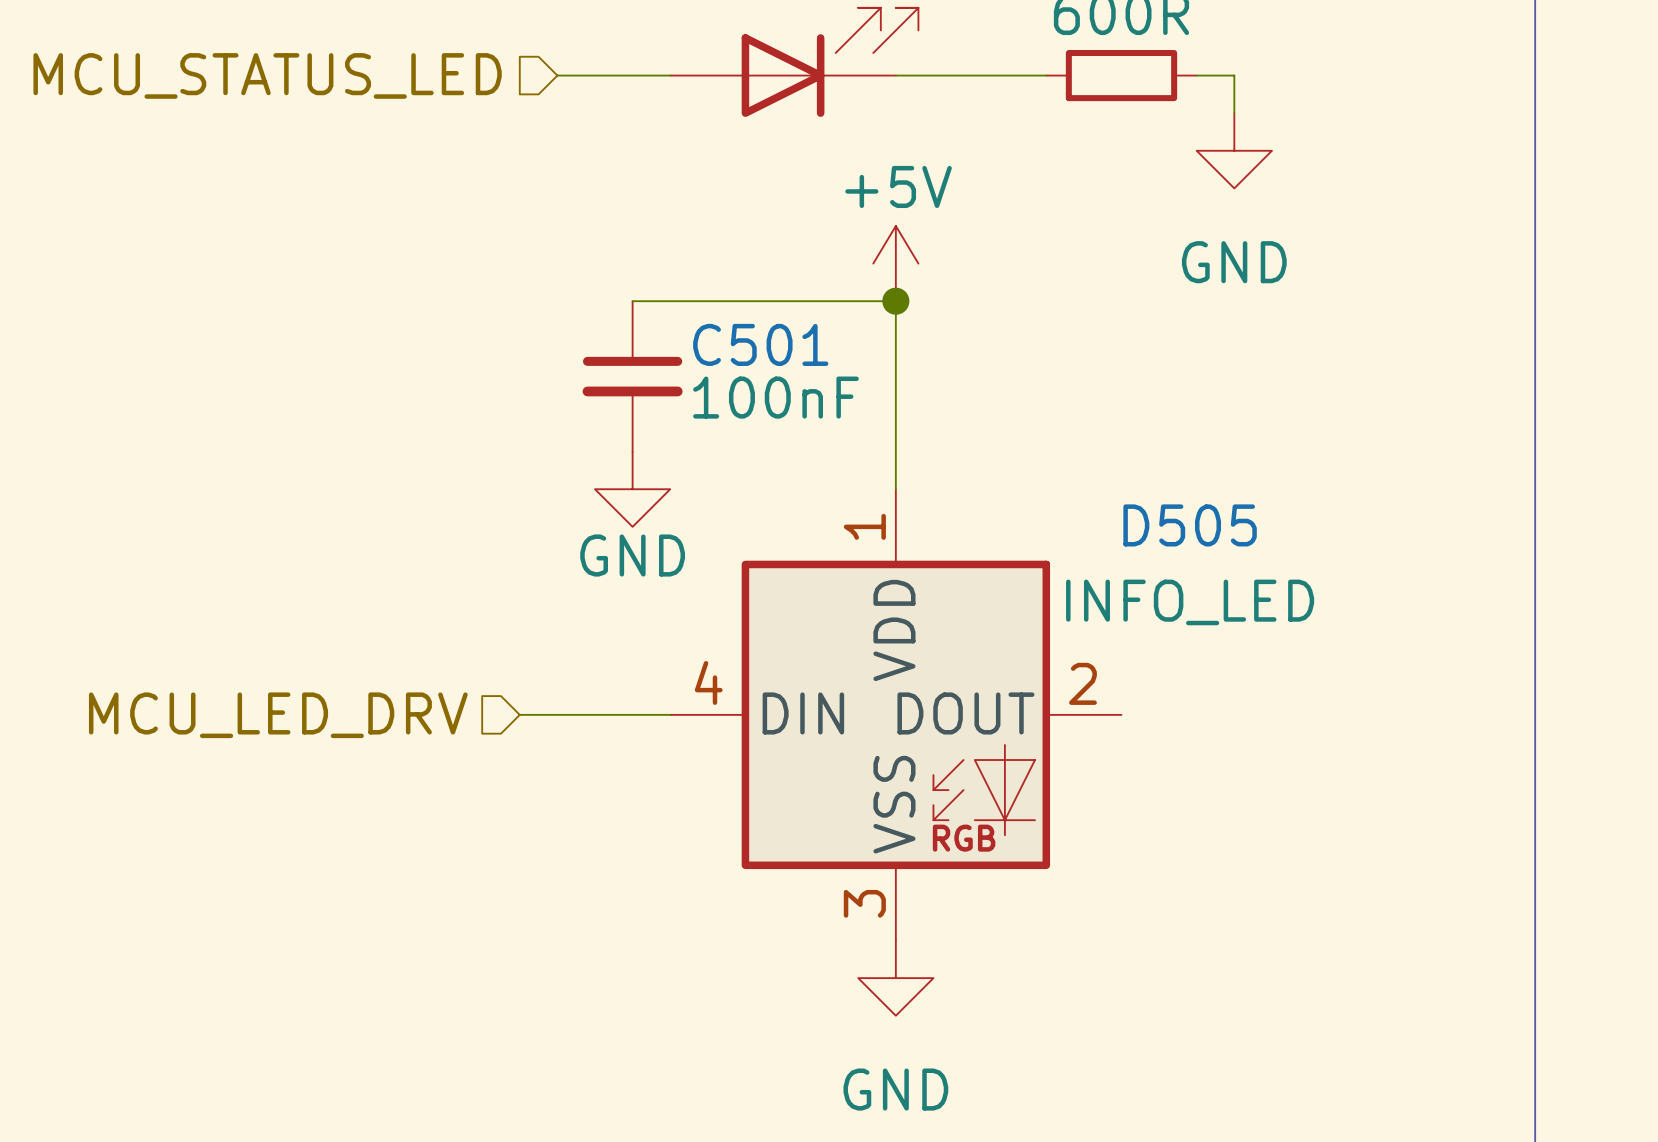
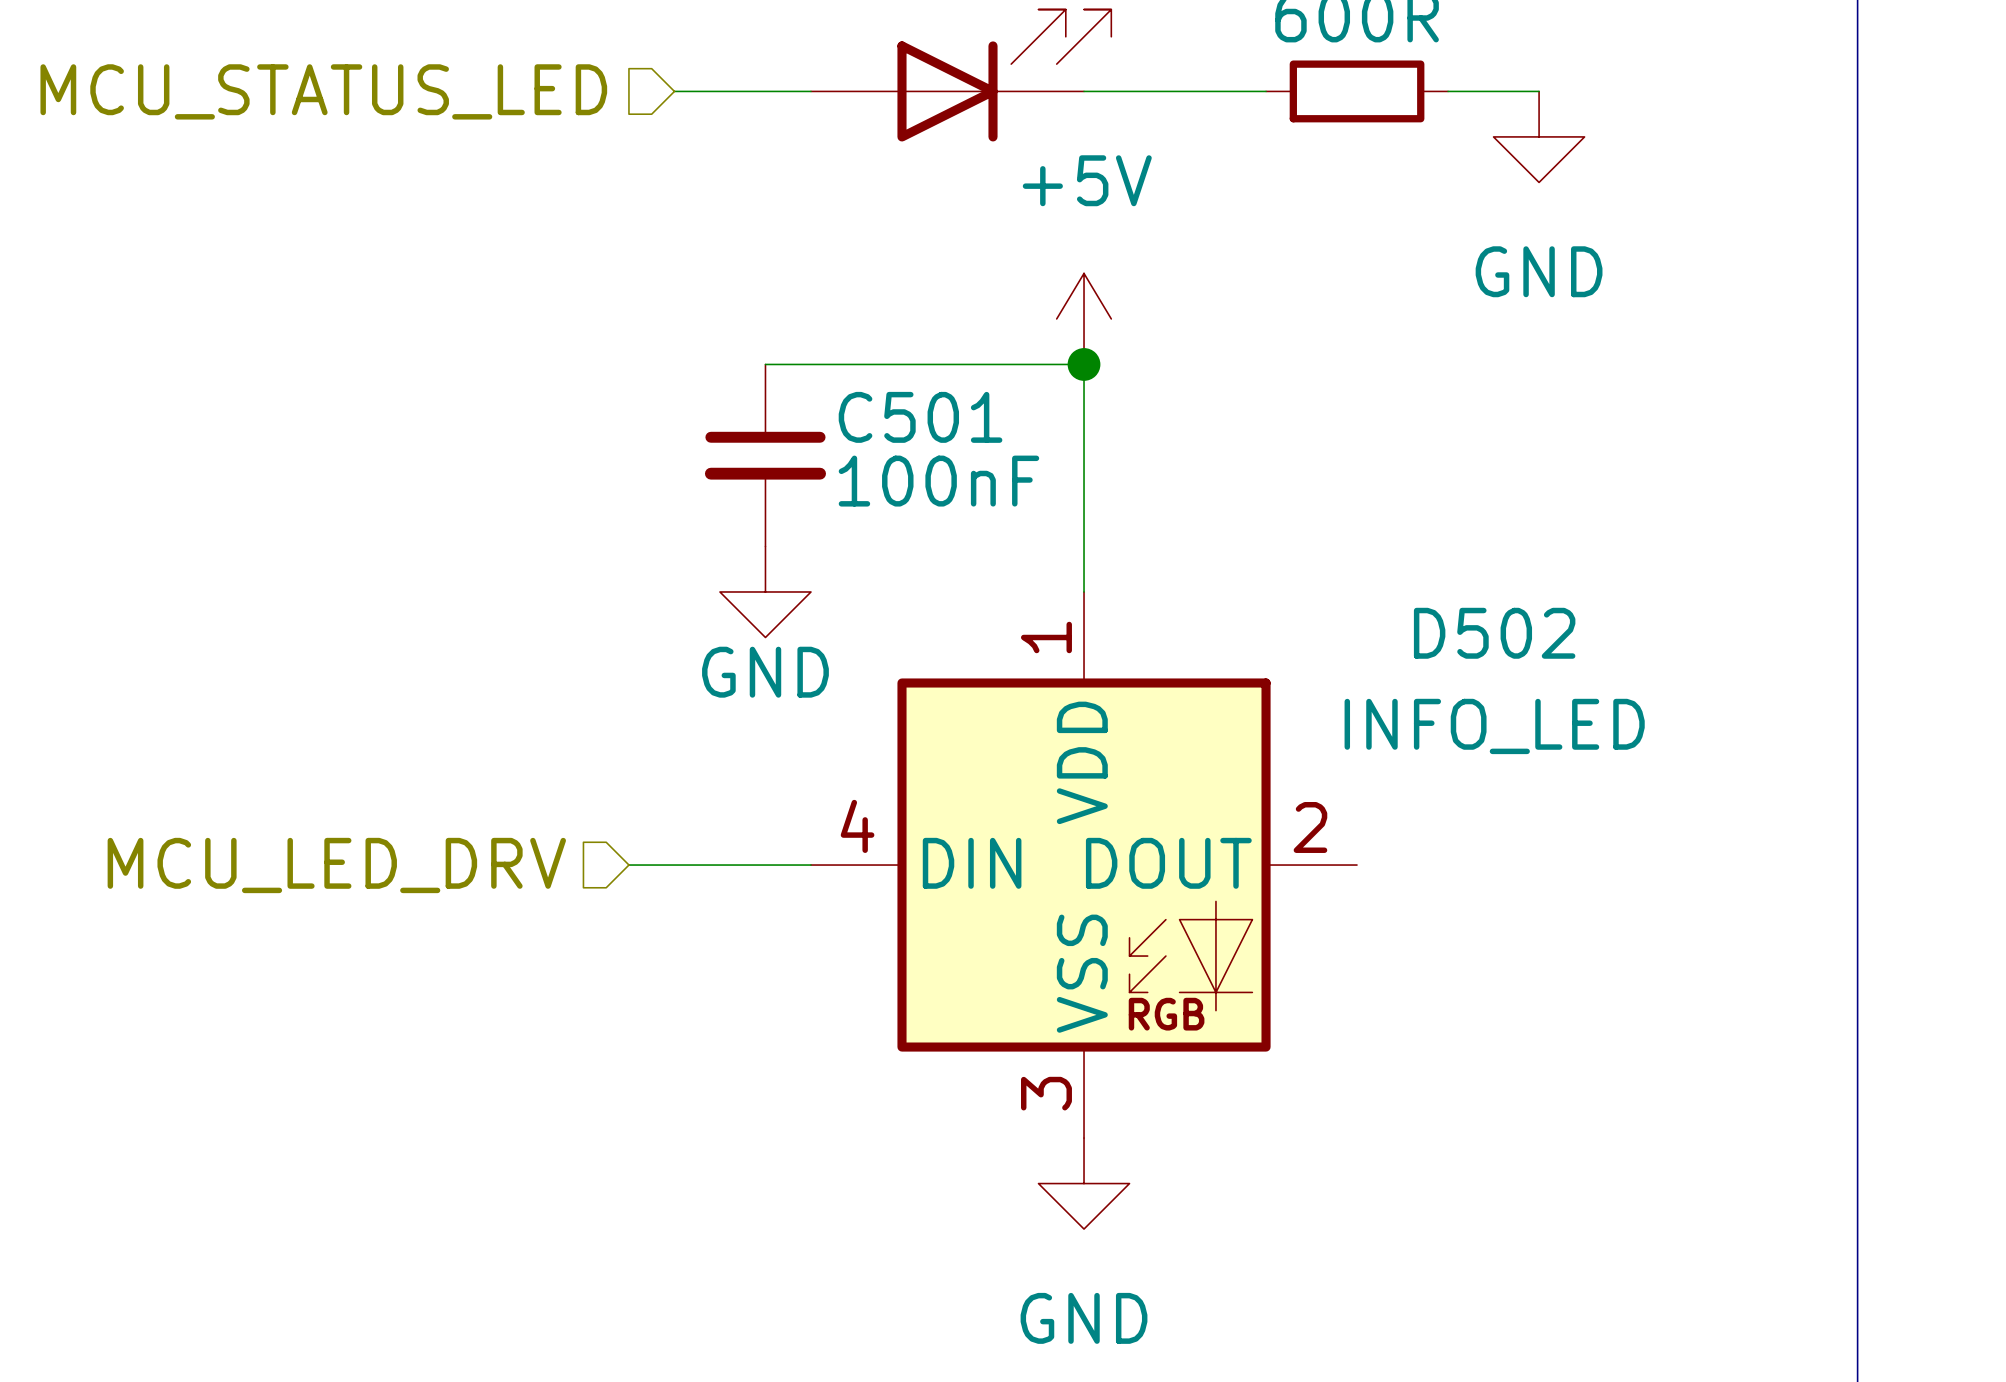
wire: (1234, 75) (1234, 113) -> (1493, 91) (1539, 91)
power symbol position: GND (1234, 150) -> GND (1539, 136)
power symbol text position: +5V (898, 186) -> +5V (1087, 180)
D505 name: D505 (1190, 525) -> D502 (1494, 633)
D505 value position: INFO_LED (1190, 602) -> INFO_LED (1494, 726)

